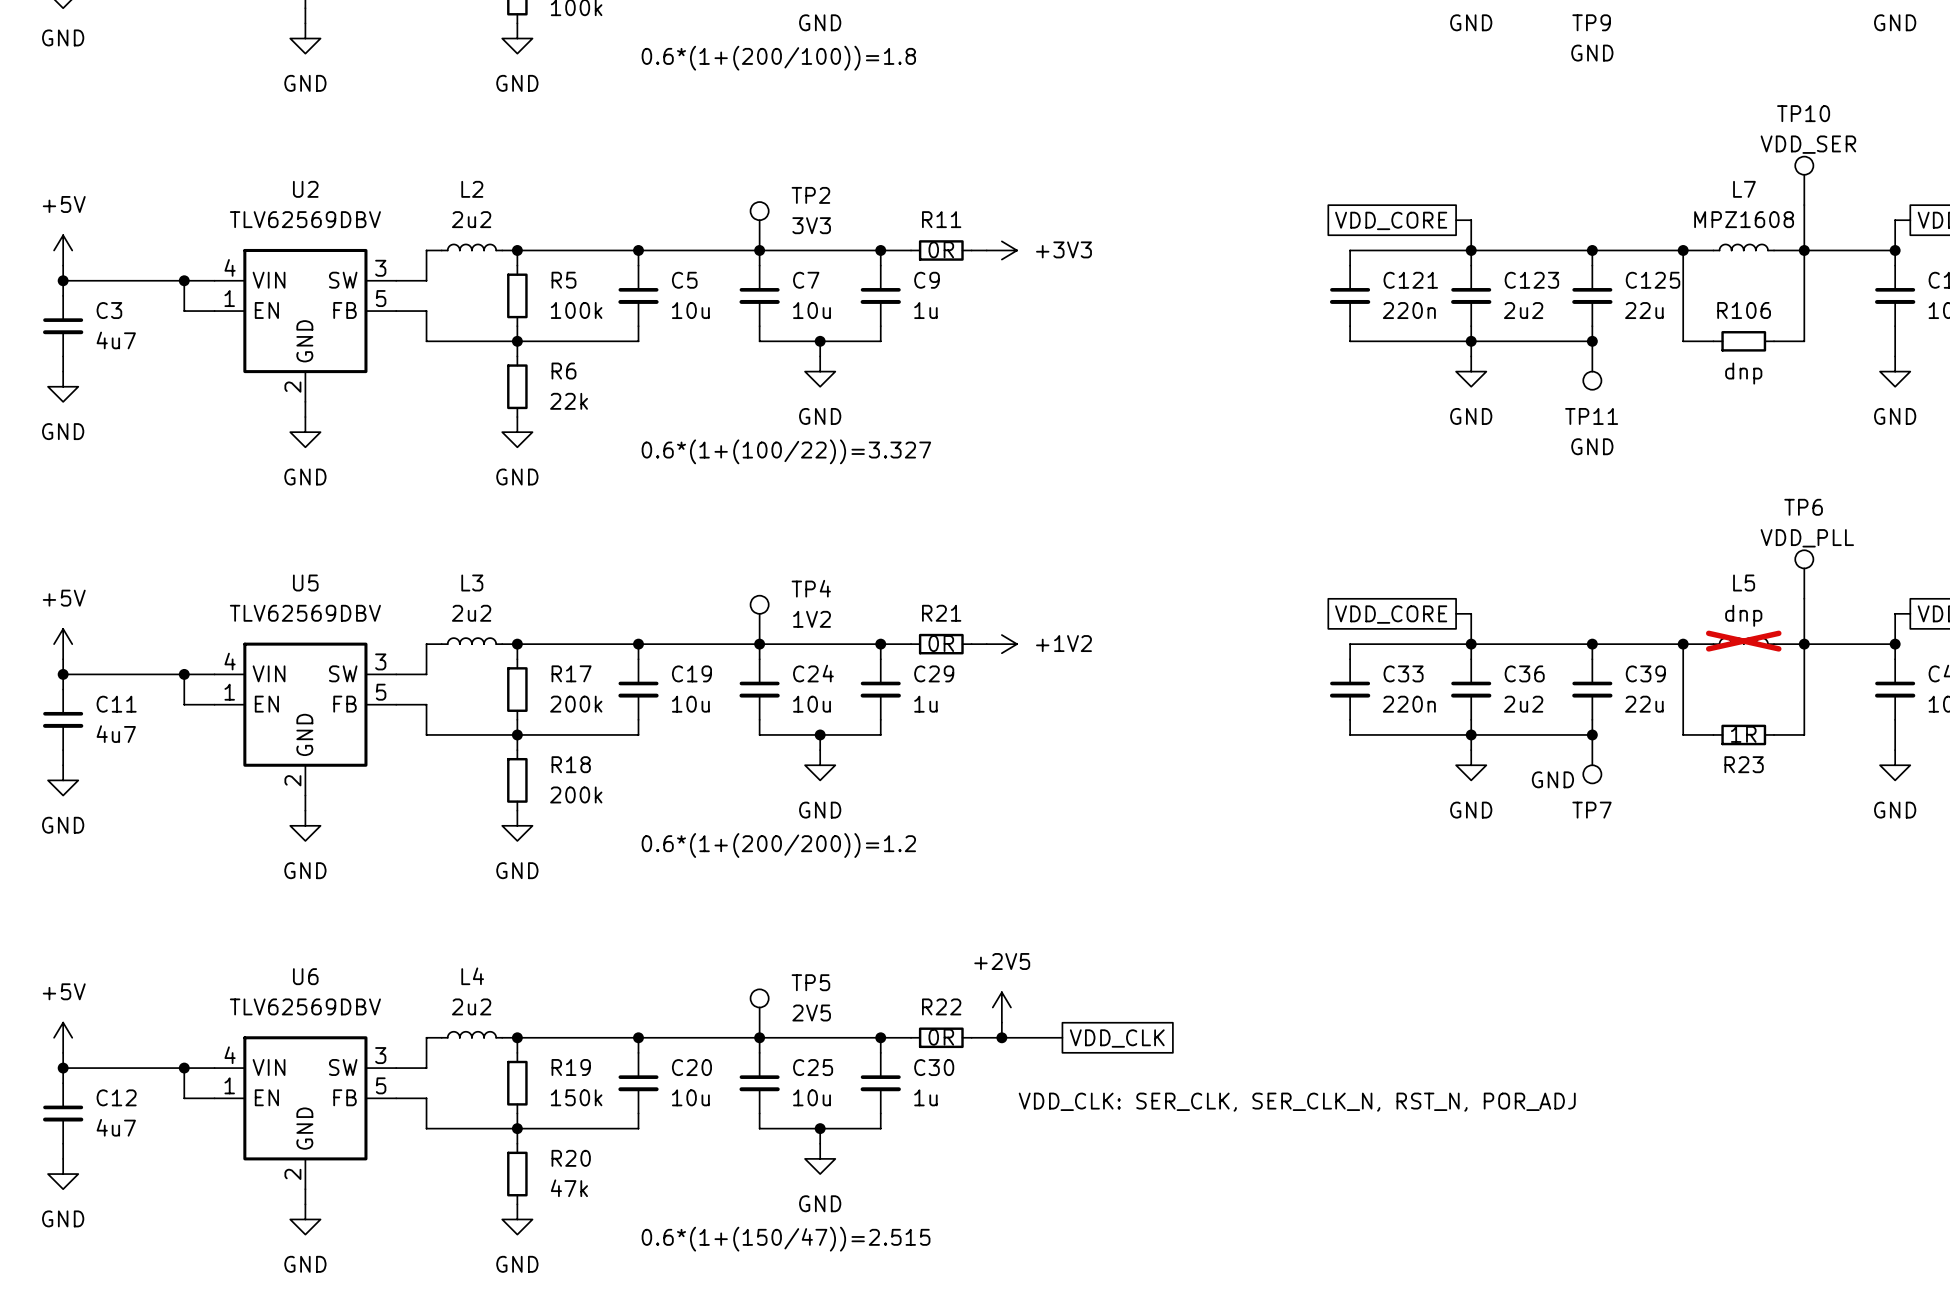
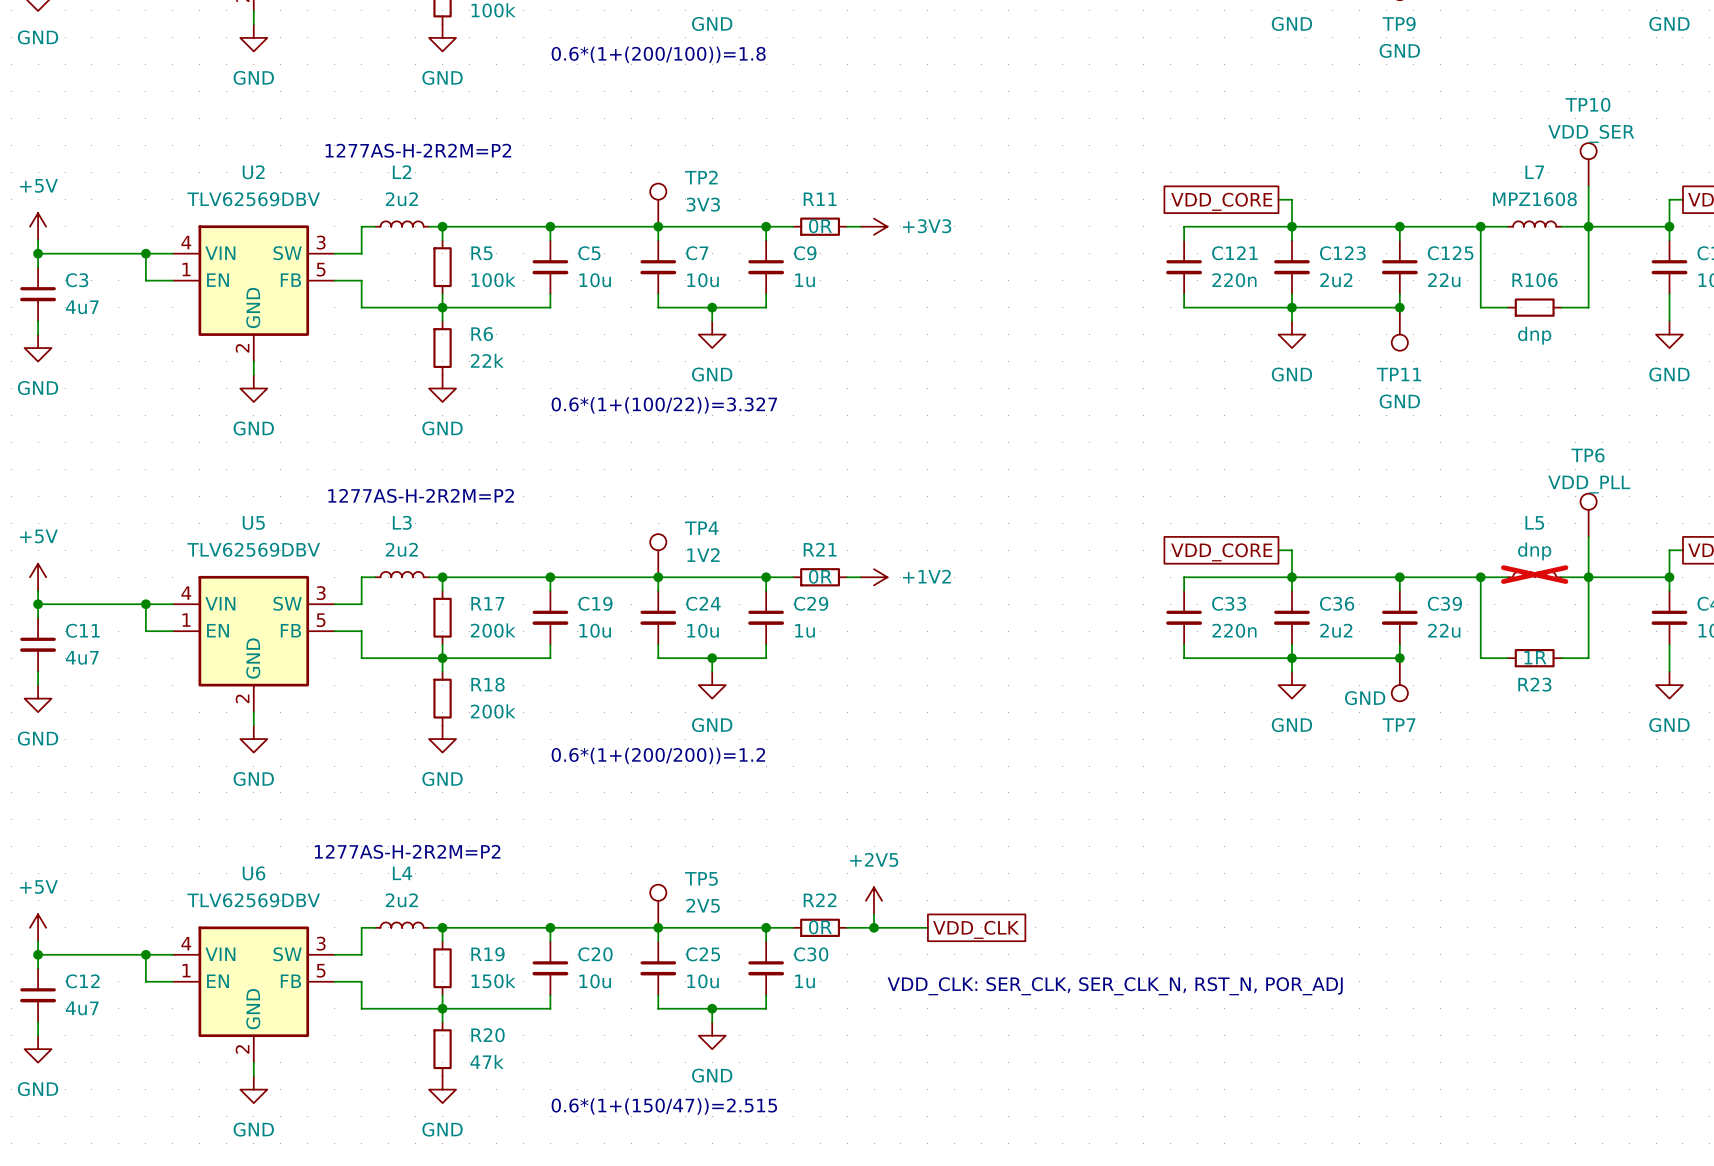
text: none -> 1277AS-H-2R2M=P2 (418, 150)
text: none -> 1277AS-H-2R2M=P2 (421, 495)
text: none -> 1277AS-H-2R2M=P2 (407, 851)

